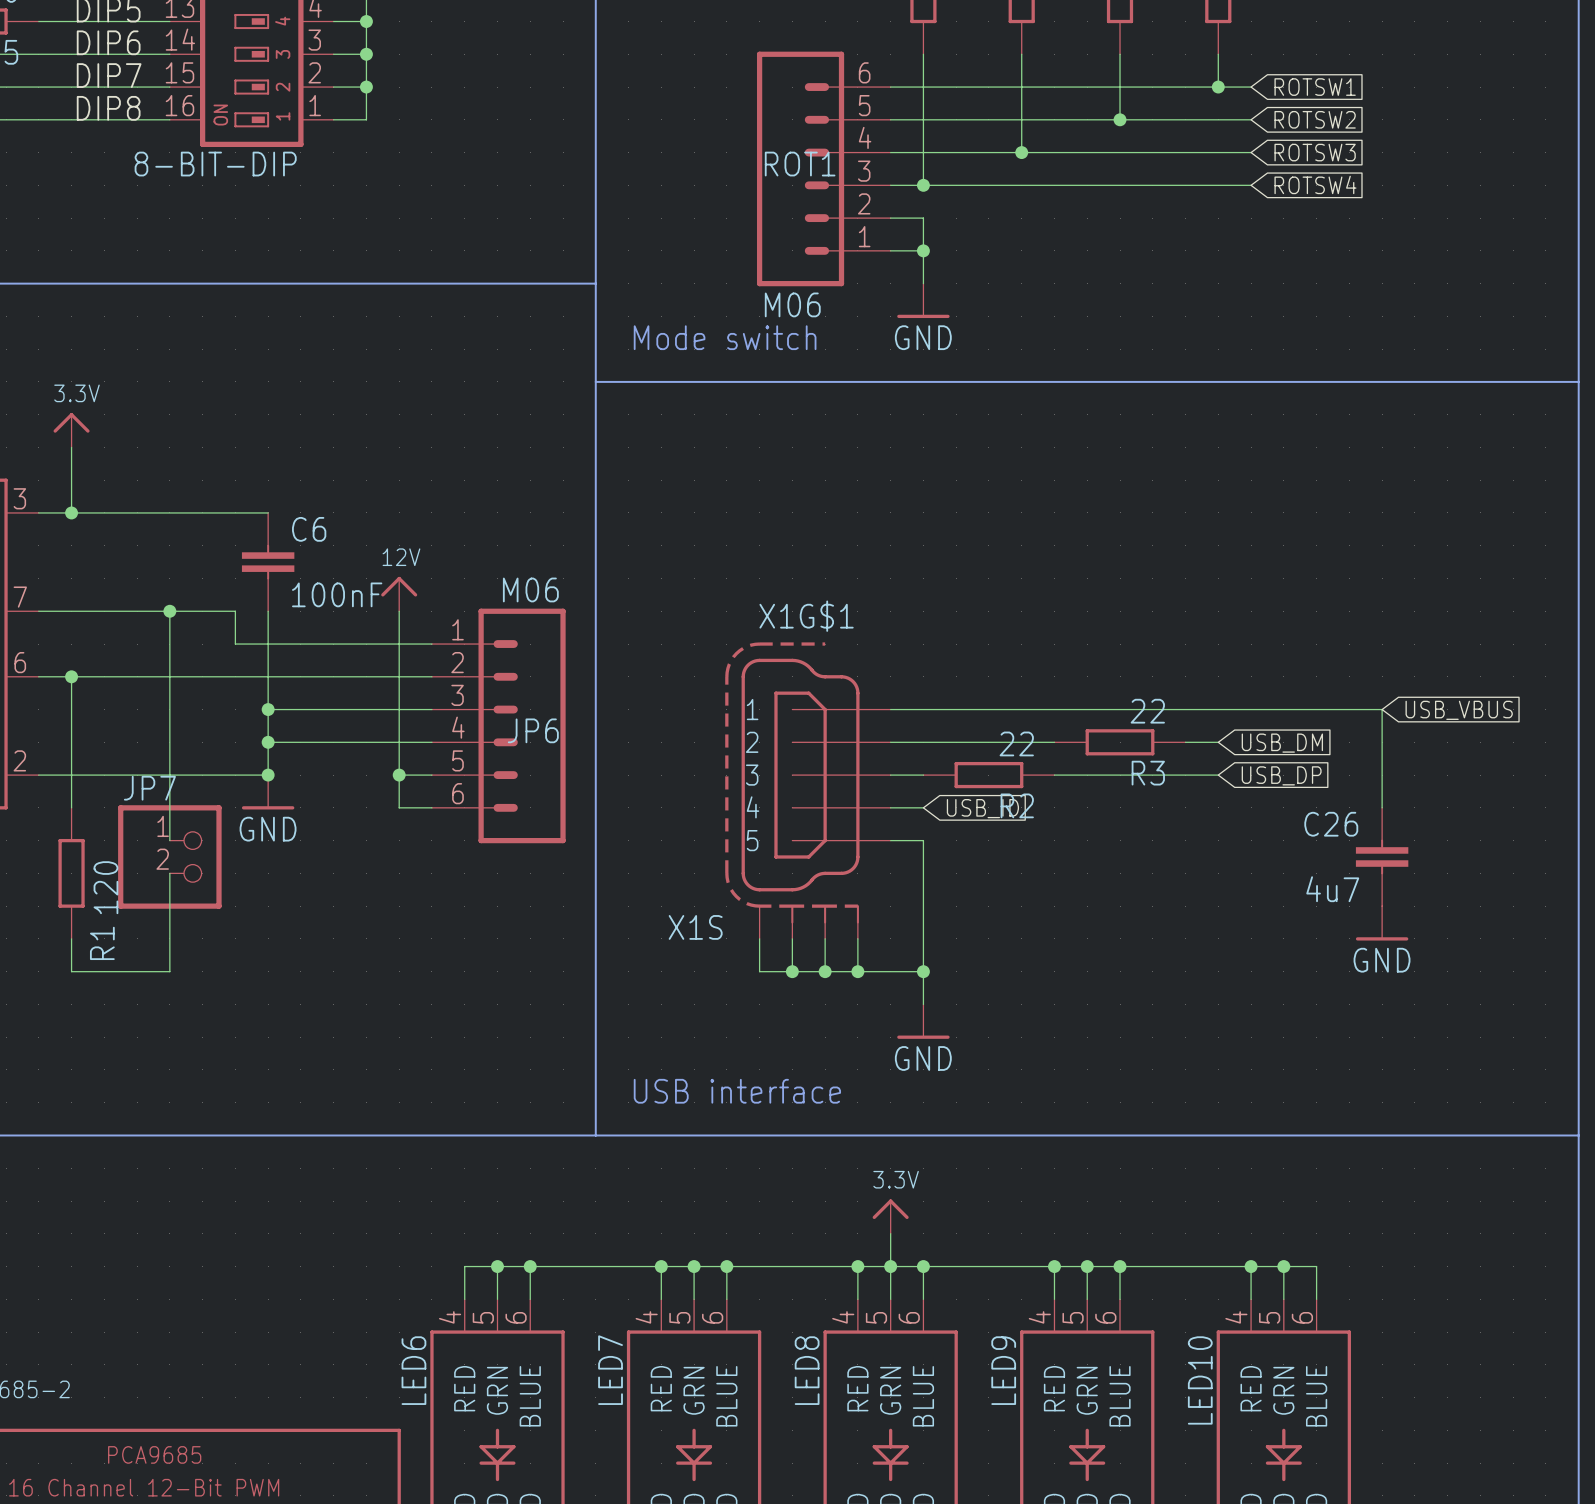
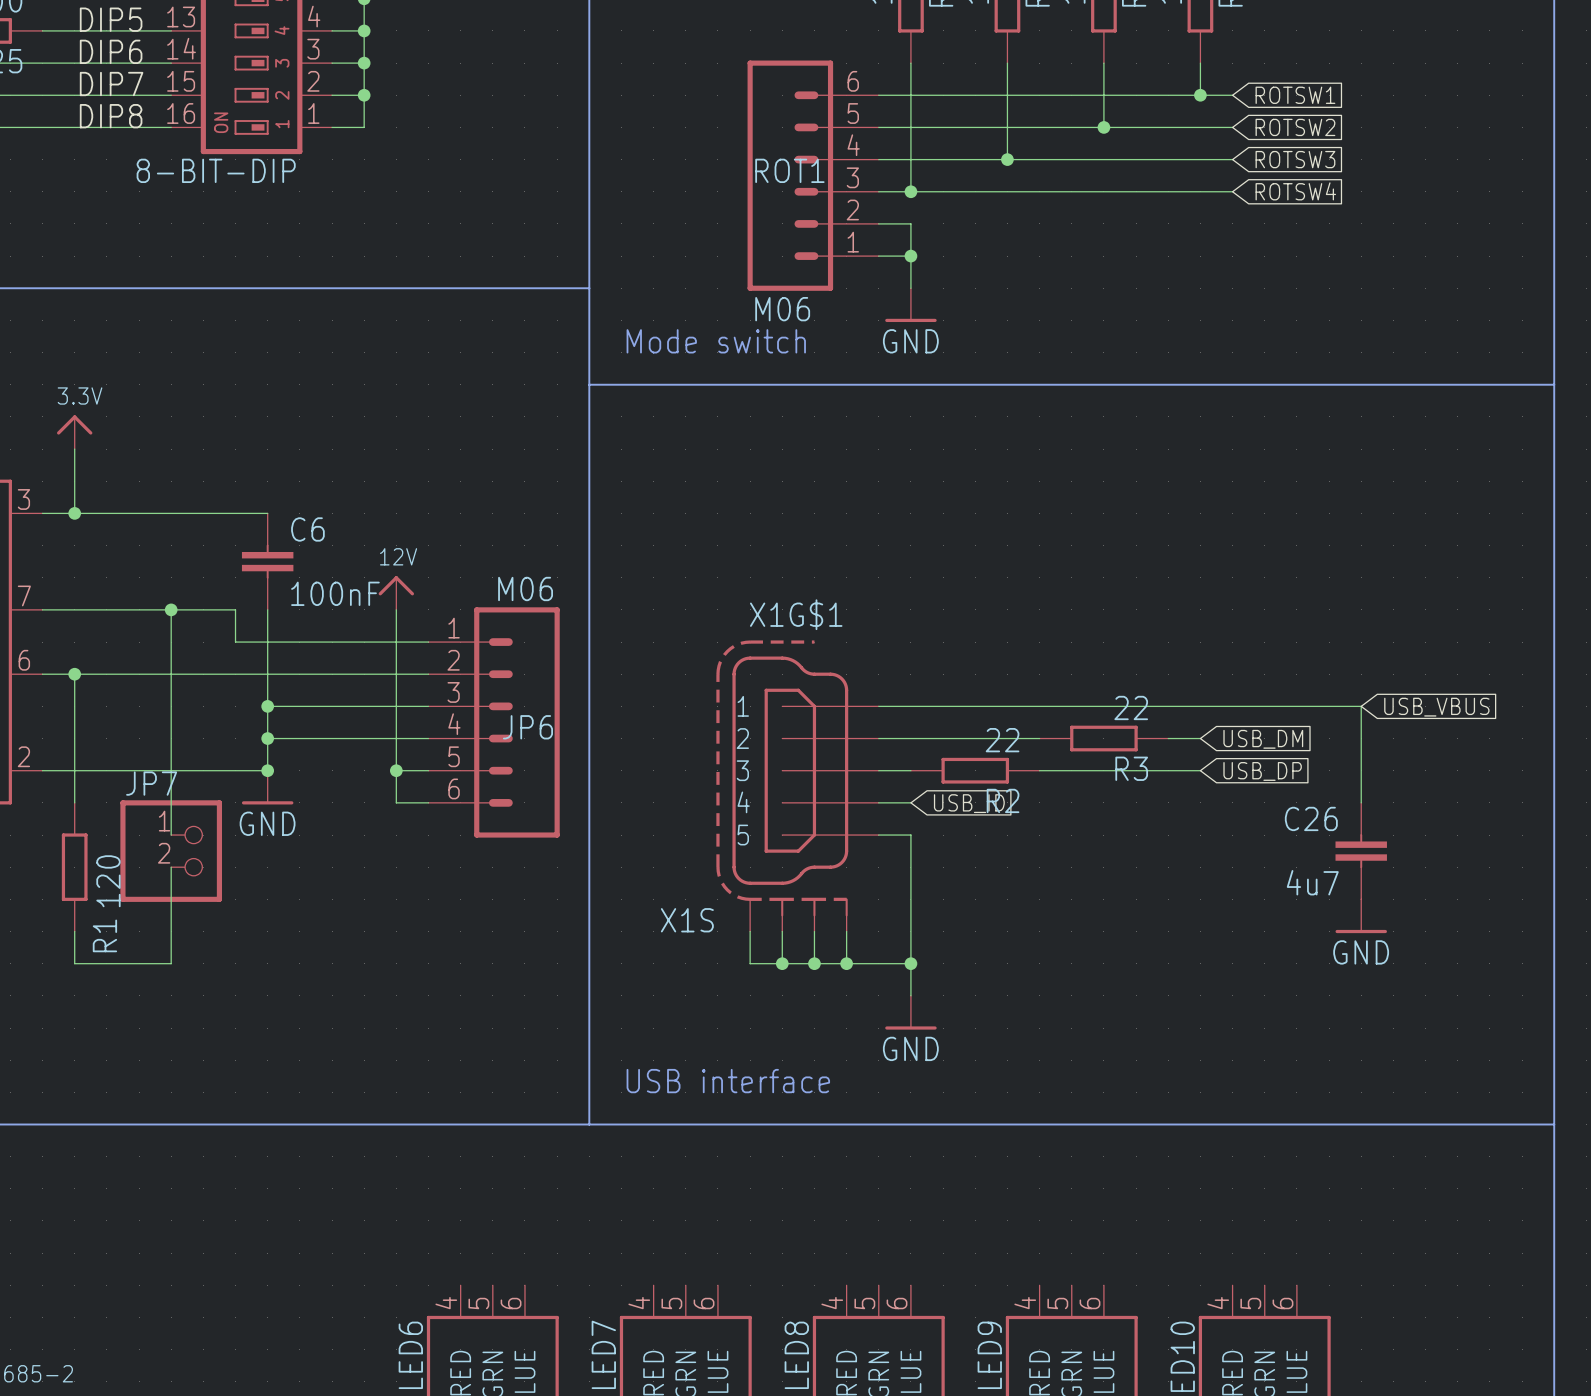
power symbol: 3.3V (890, 1216) -> none
wire: (890, 1233) (890, 1299) -> none
wire: (497, 1266) (497, 1299) -> none
junction: (497, 1266) -> none
wire: (530, 1266) (530, 1299) -> none
junction: (530, 1266) -> none
wire: (661, 1266) (661, 1299) -> none
junction: (661, 1266) -> none
wire: (694, 1266) (694, 1299) -> none
junction: (694, 1266) -> none
wire: (726, 1266) (726, 1299) -> none
junction: (726, 1266) -> none
wire: (857, 1266) (857, 1299) -> none
junction: (857, 1266) -> none
junction: (890, 1266) -> none
wire: (923, 1266) (923, 1299) -> none
junction: (923, 1266) -> none
wire: (1054, 1266) (1054, 1299) -> none
junction: (1054, 1266) -> none
wire: (1087, 1266) (1087, 1299) -> none
junction: (1087, 1266) -> none
wire: (1120, 1266) (1120, 1299) -> none
junction: (1120, 1266) -> none
wire: (1251, 1266) (1251, 1299) -> none
junction: (1251, 1266) -> none
wire: (1283, 1266) (1283, 1299) -> none
junction: (1283, 1266) -> none
wire: (464, 1299) (464, 1266) (1316, 1266) (1316, 1299) -> none

